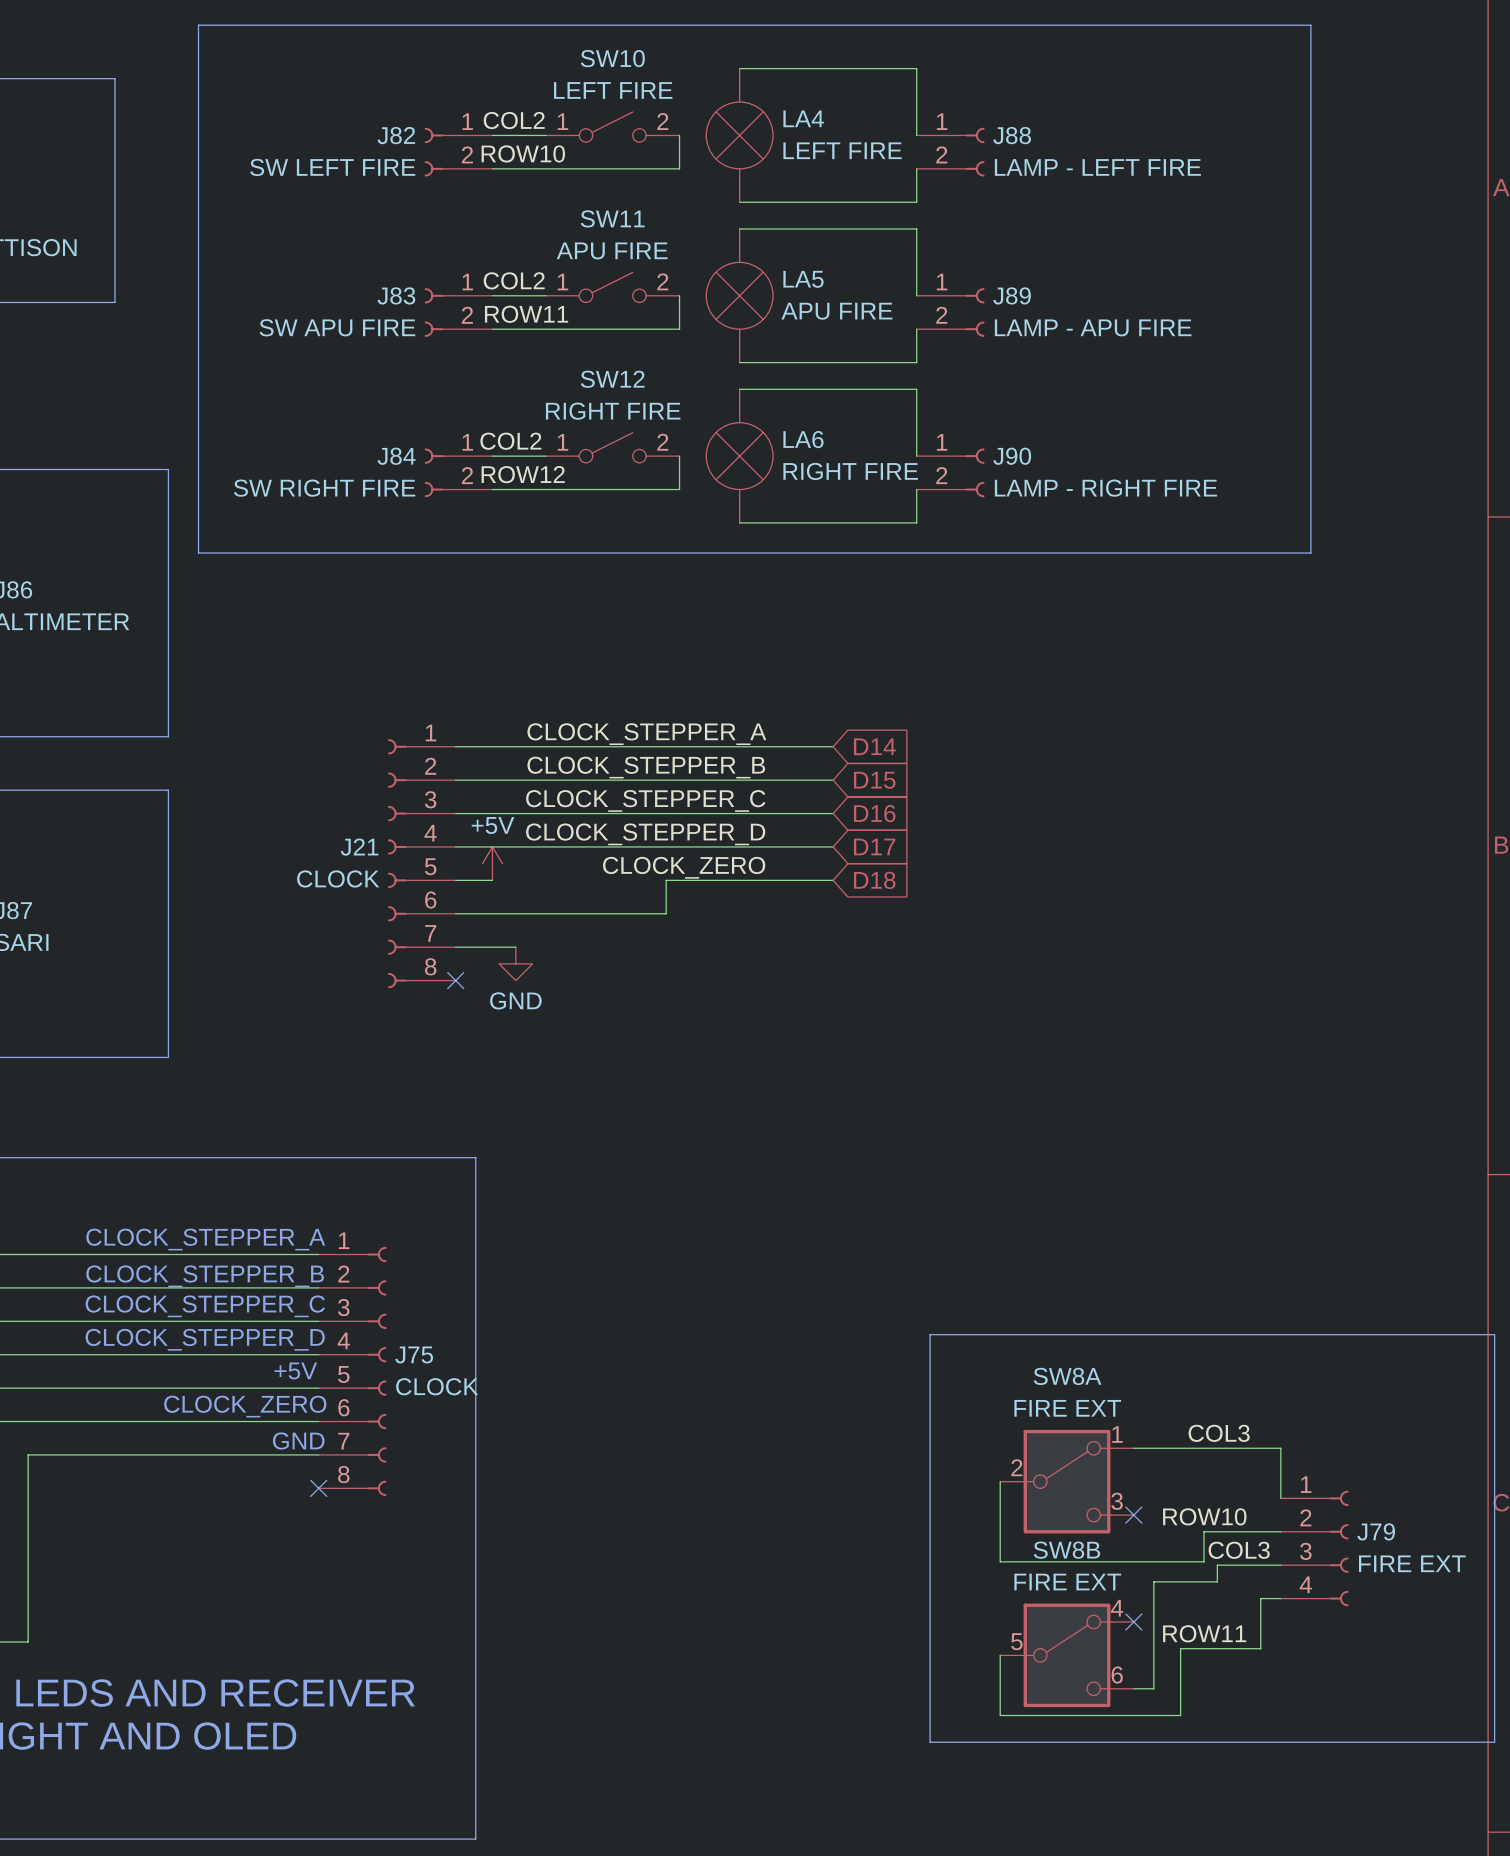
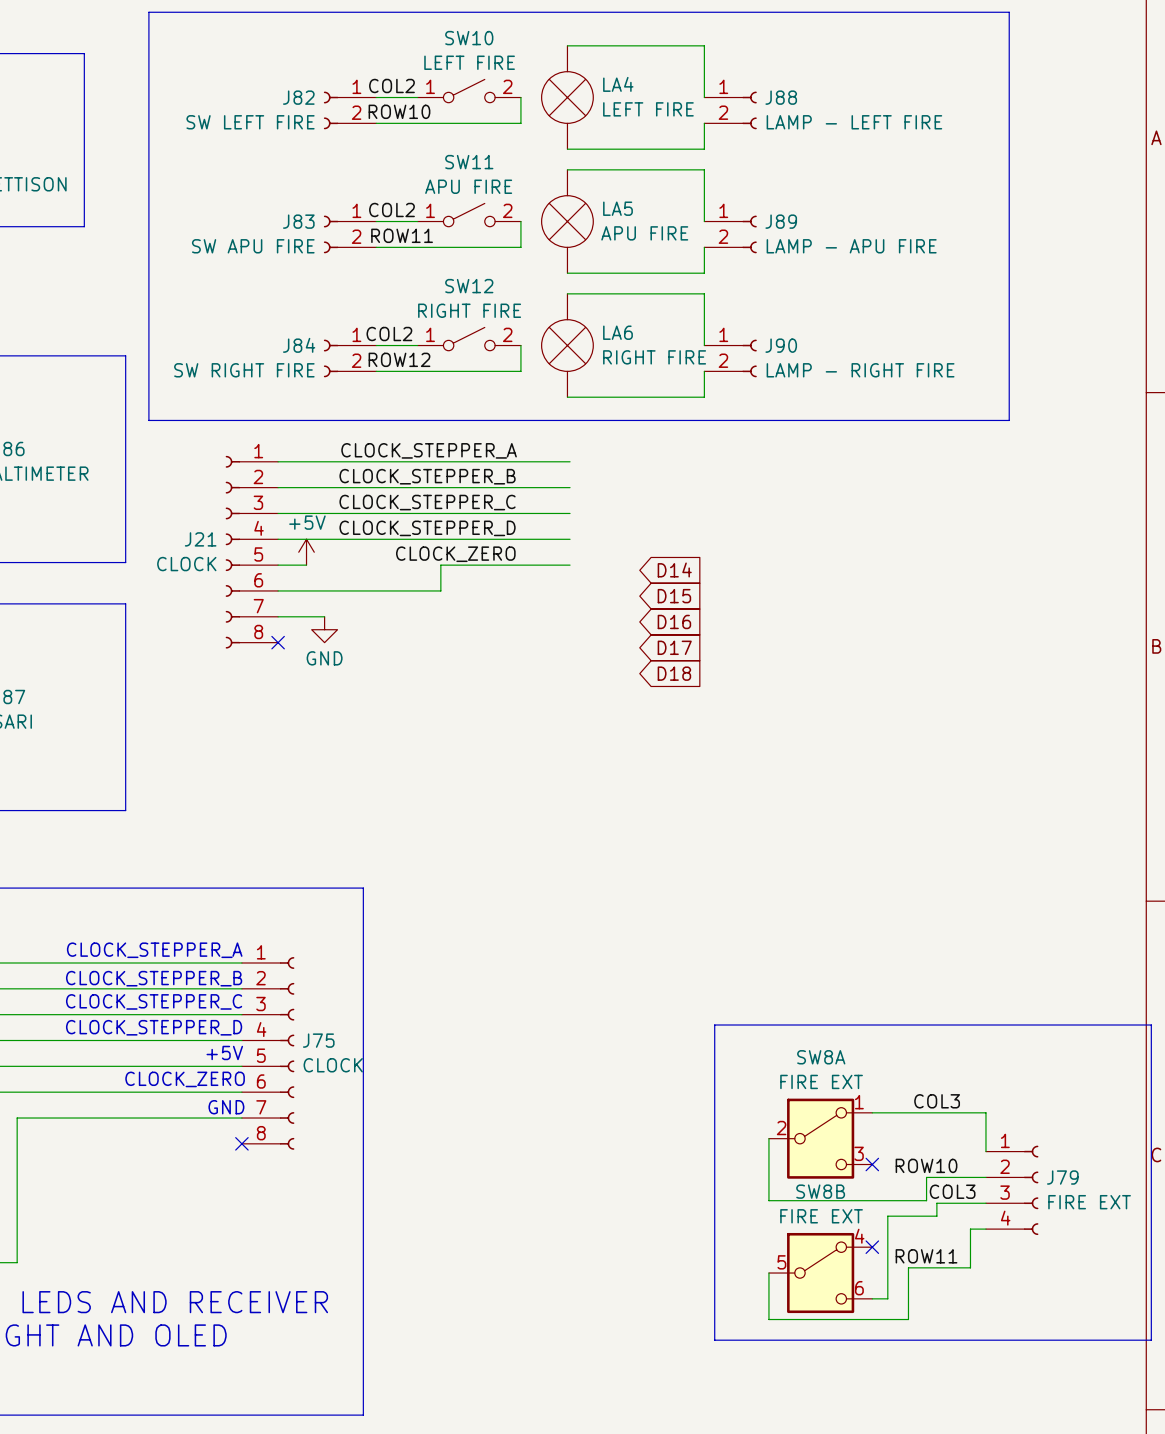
label position: CLOCK_STEPPER_A (646, 734) -> CLOCK_STEPPER_A (429, 450)
wire: (455, 746) (833, 746) -> (278, 461) (570, 461)
label position: CLOCK_STEPPER_B (646, 767) -> CLOCK_STEPPER_B (427, 476)
wire: (455, 780) (833, 780) -> (278, 487) (570, 487)
label position: CLOCK_STEPPER_C (645, 800) -> CLOCK_STEPPER_C (427, 502)
wire: (455, 813) (833, 813) -> (278, 513) (570, 513)
label position: CLOCK_STEPPER_D (645, 834) -> CLOCK_STEPPER_D (427, 528)
no-connect mark: none -> (278, 642)
wire: (455, 846) (833, 846) -> (278, 539) (570, 539)
J21 position: (421, 863) -> (251, 552)
power symbol position: +5V (492, 863) -> +5V (306, 552)
label position: CLOCK_ZERO (684, 867) -> CLOCK_ZERO (455, 554)
wire: (455, 880) (492, 880) -> (278, 565) (306, 565)
wire: (833, 880) (666, 880) (666, 913) (455, 913) -> (570, 565) (440, 565) (440, 590) (278, 590)
wire: (455, 947) (515, 947) -> (278, 616) (324, 616)
power symbol position: GND (515, 963) -> GND (324, 629)
no-connect mark: (455, 980) -> none

